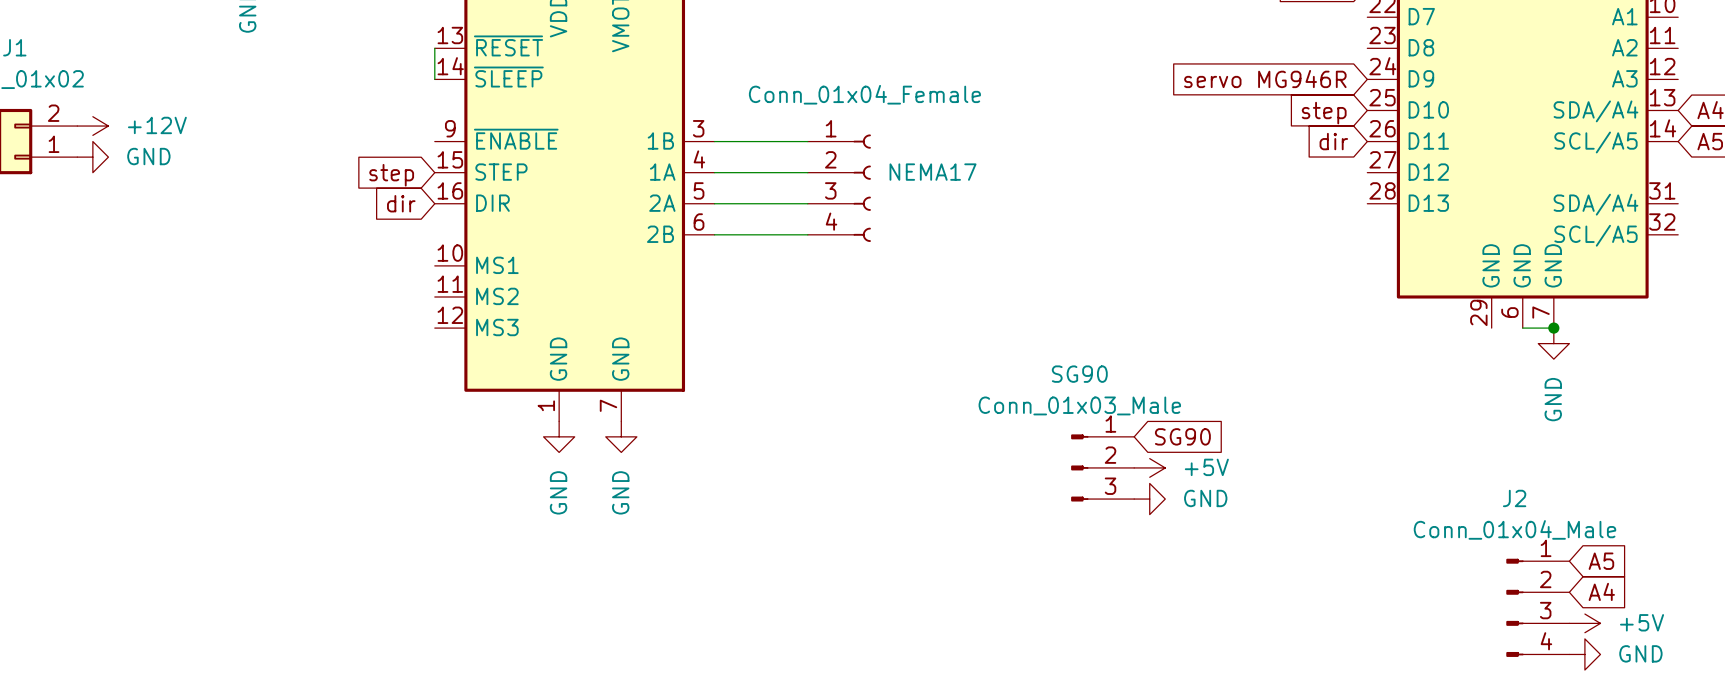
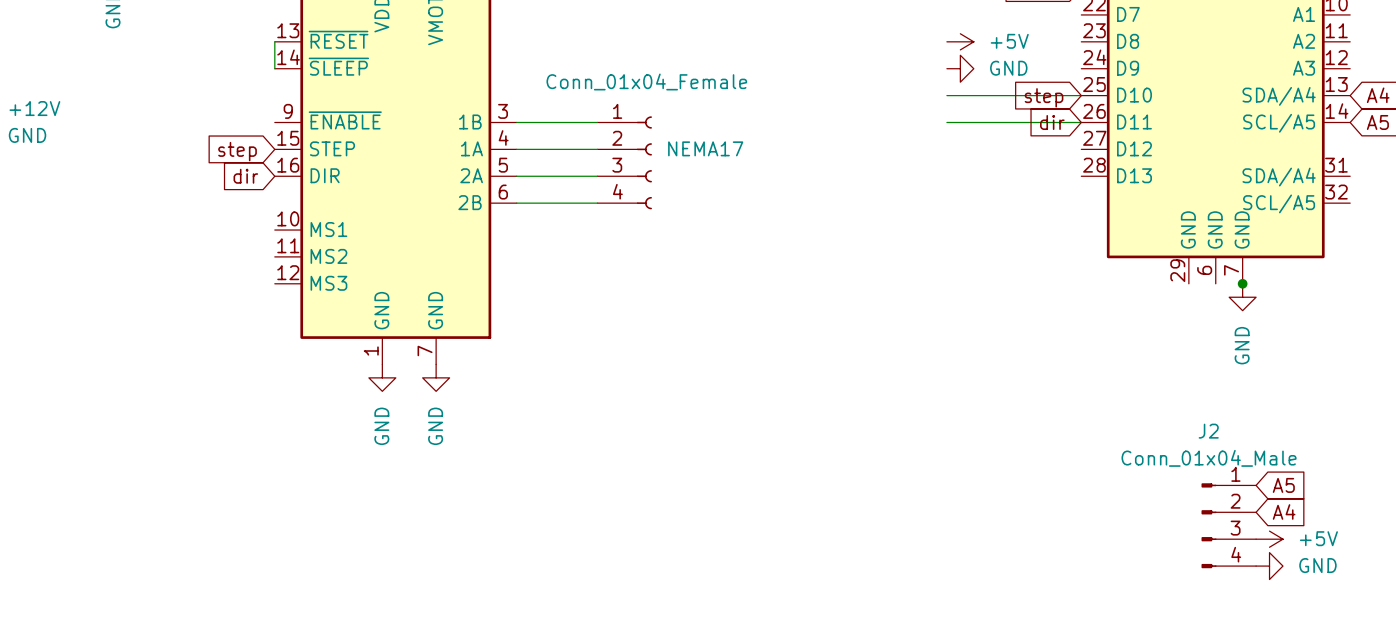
power symbol: none -> +5V (960, 41)
power symbol: none -> GND (960, 68)
global label: servo MG946R (1265, 79) -> none
wire: none -> (946, 95) (1081, 95)
wire: none -> (946, 122) (1081, 122)
wire: (1522, 328) (1553, 328) -> none
global label: SG90 (1182, 436) -> none
SG90: Conn_01x03_Male (1102, 467) -> none
power symbol: +5V (1149, 467) -> none
power symbol: GND (1149, 499) -> none

